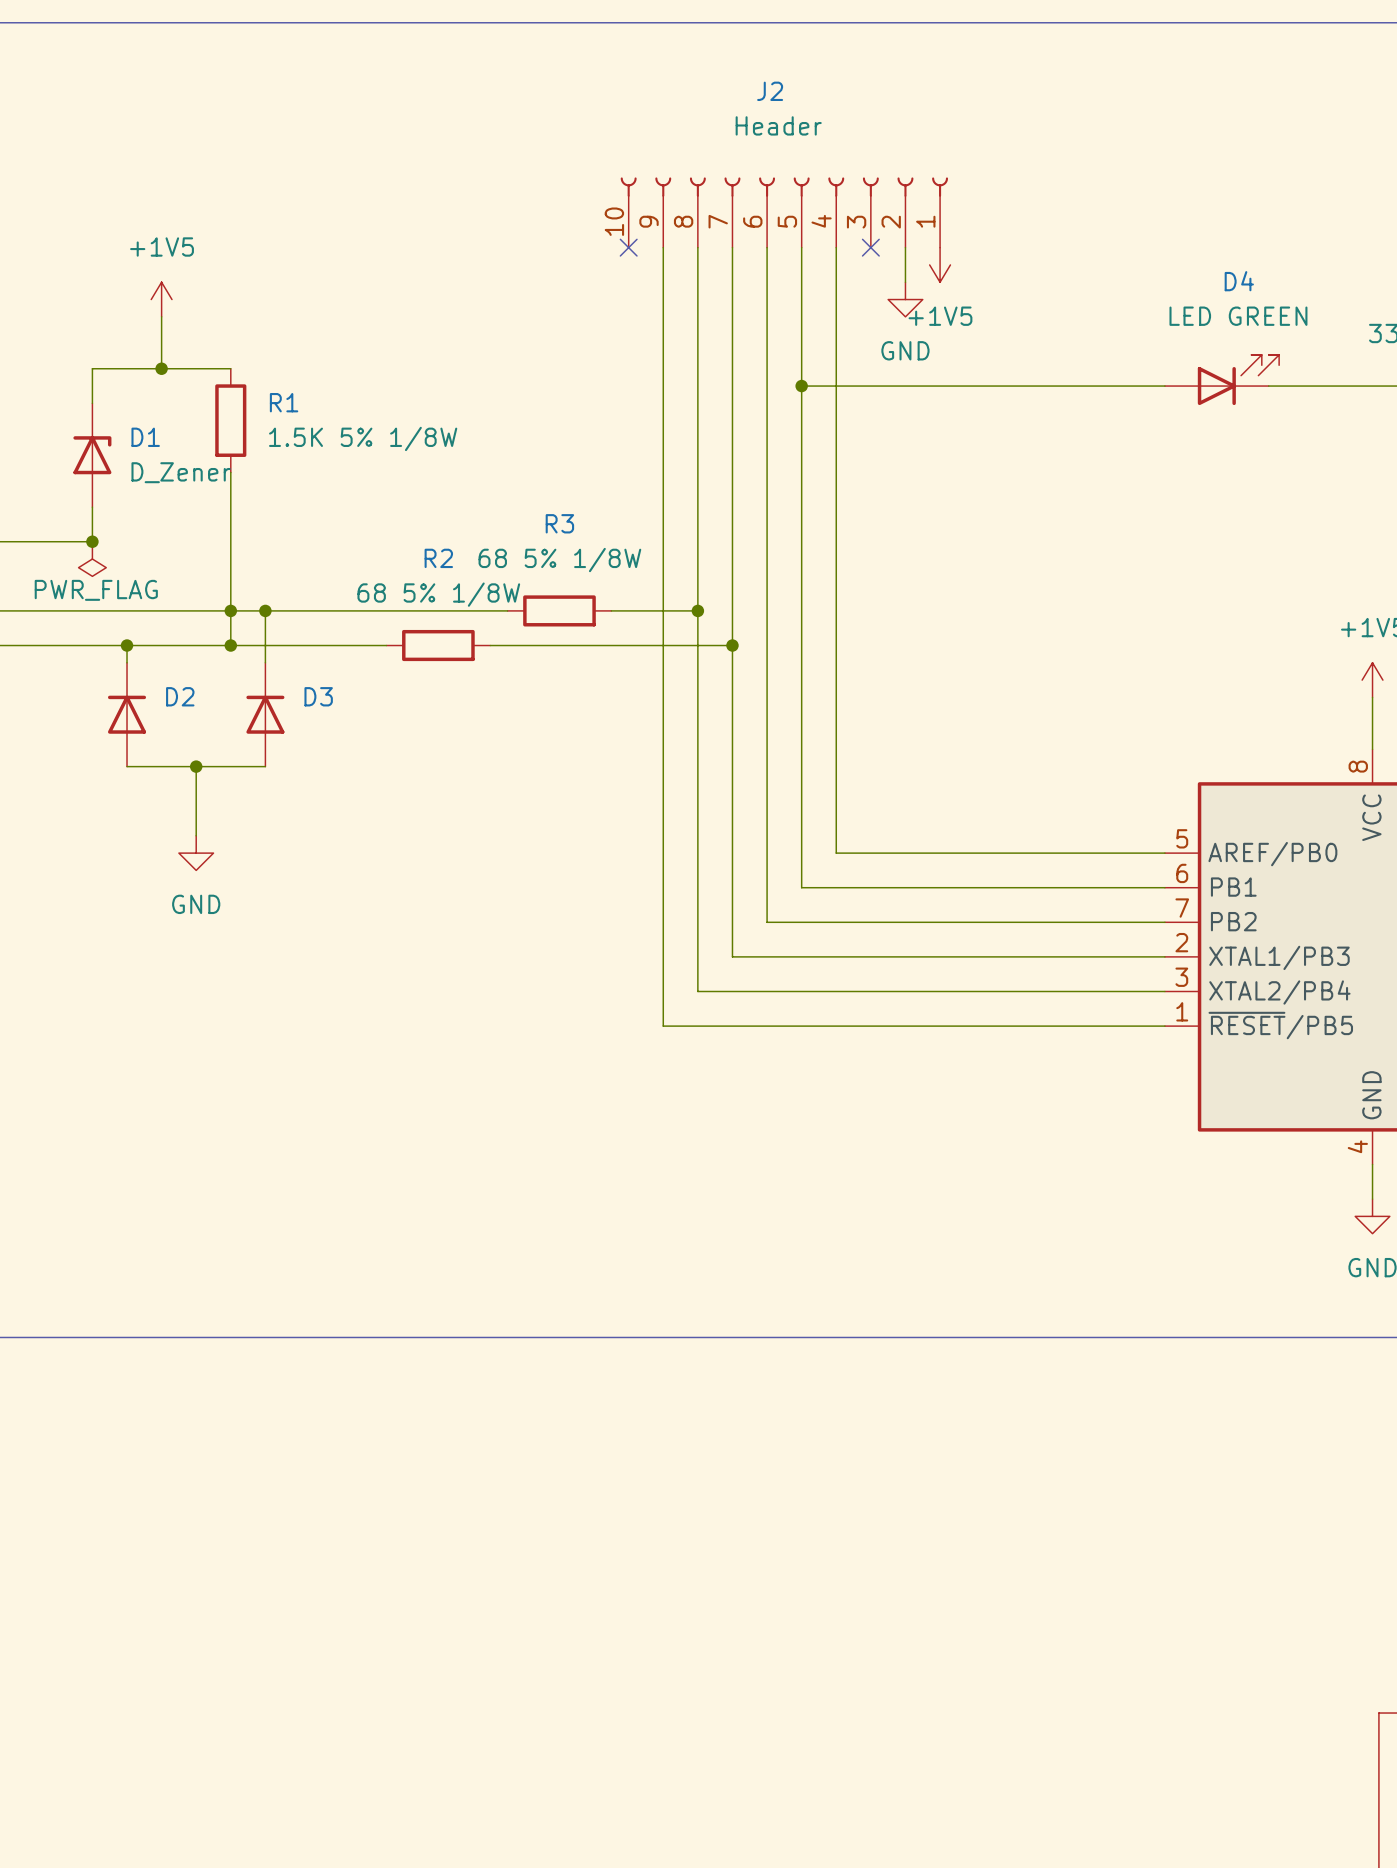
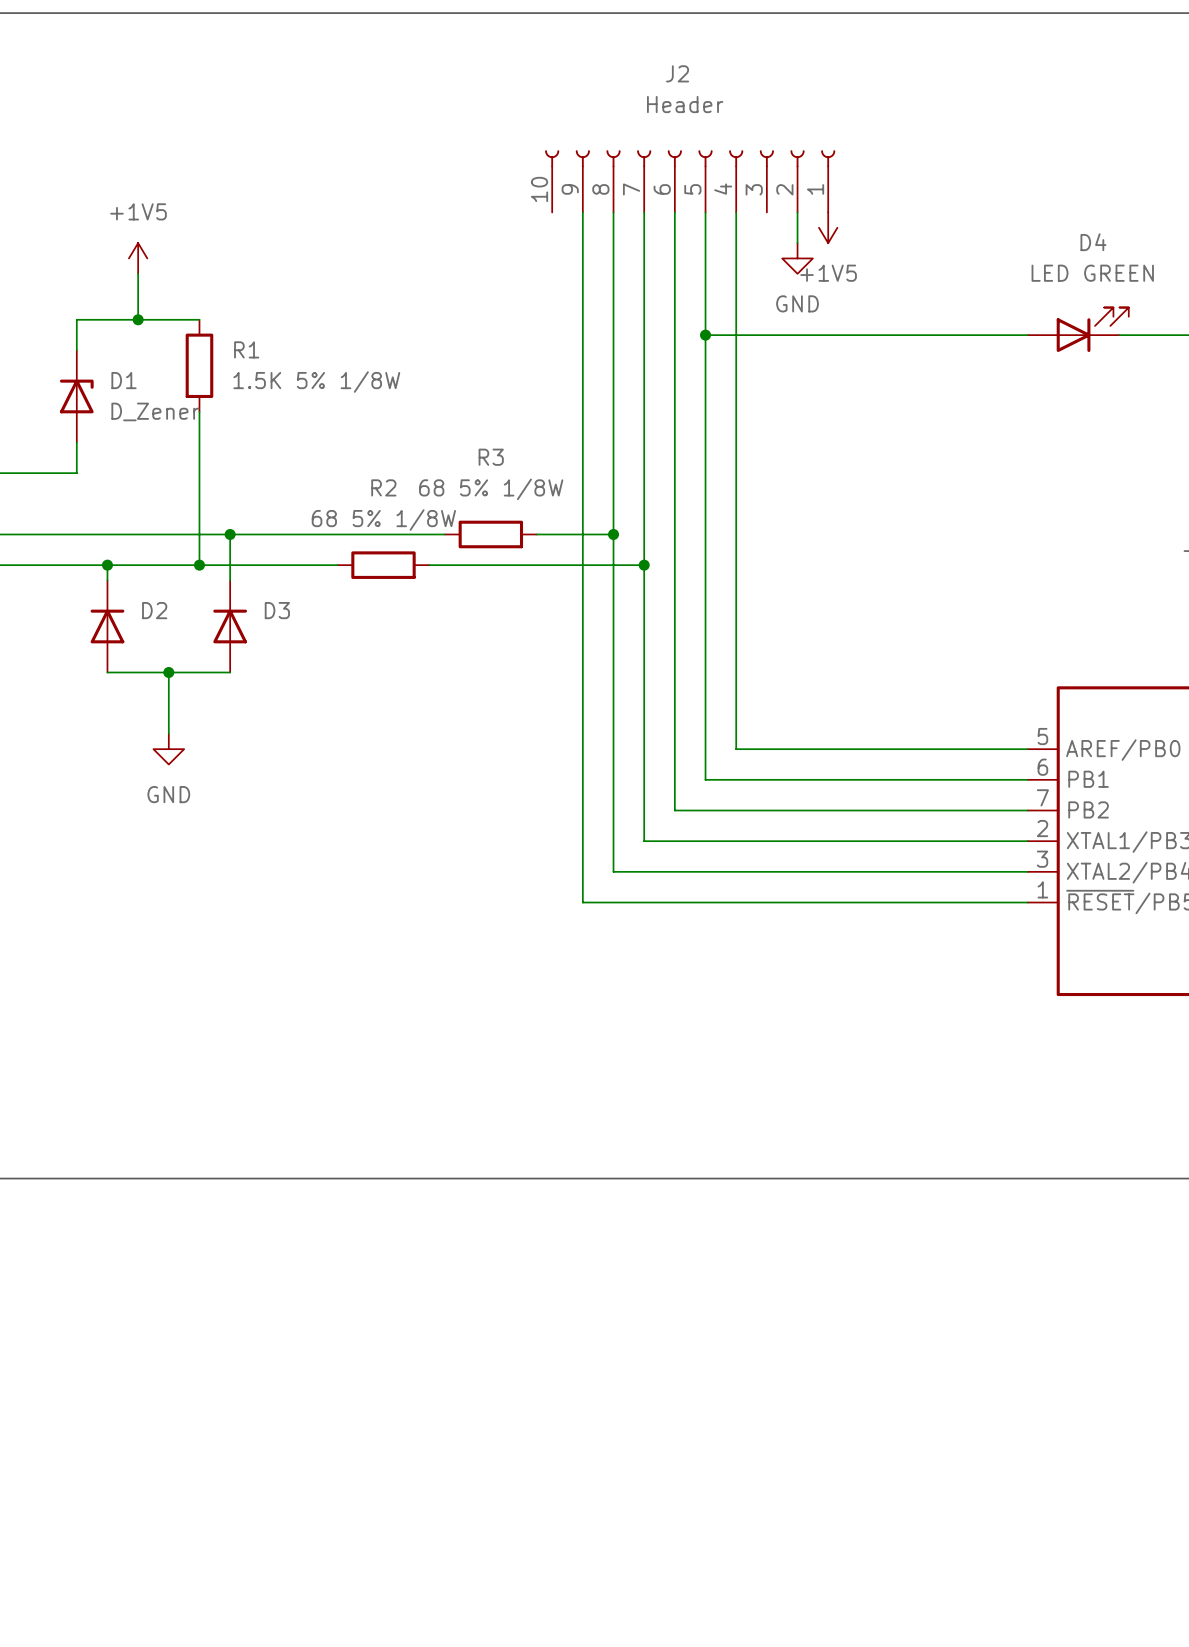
no-connect mark: (628, 247) -> none
no-connect mark: (870, 247) -> none
junction: (92, 541) -> none
power symbol: PWR_FLAG (92, 559) -> none
junction: (230, 610) -> none

